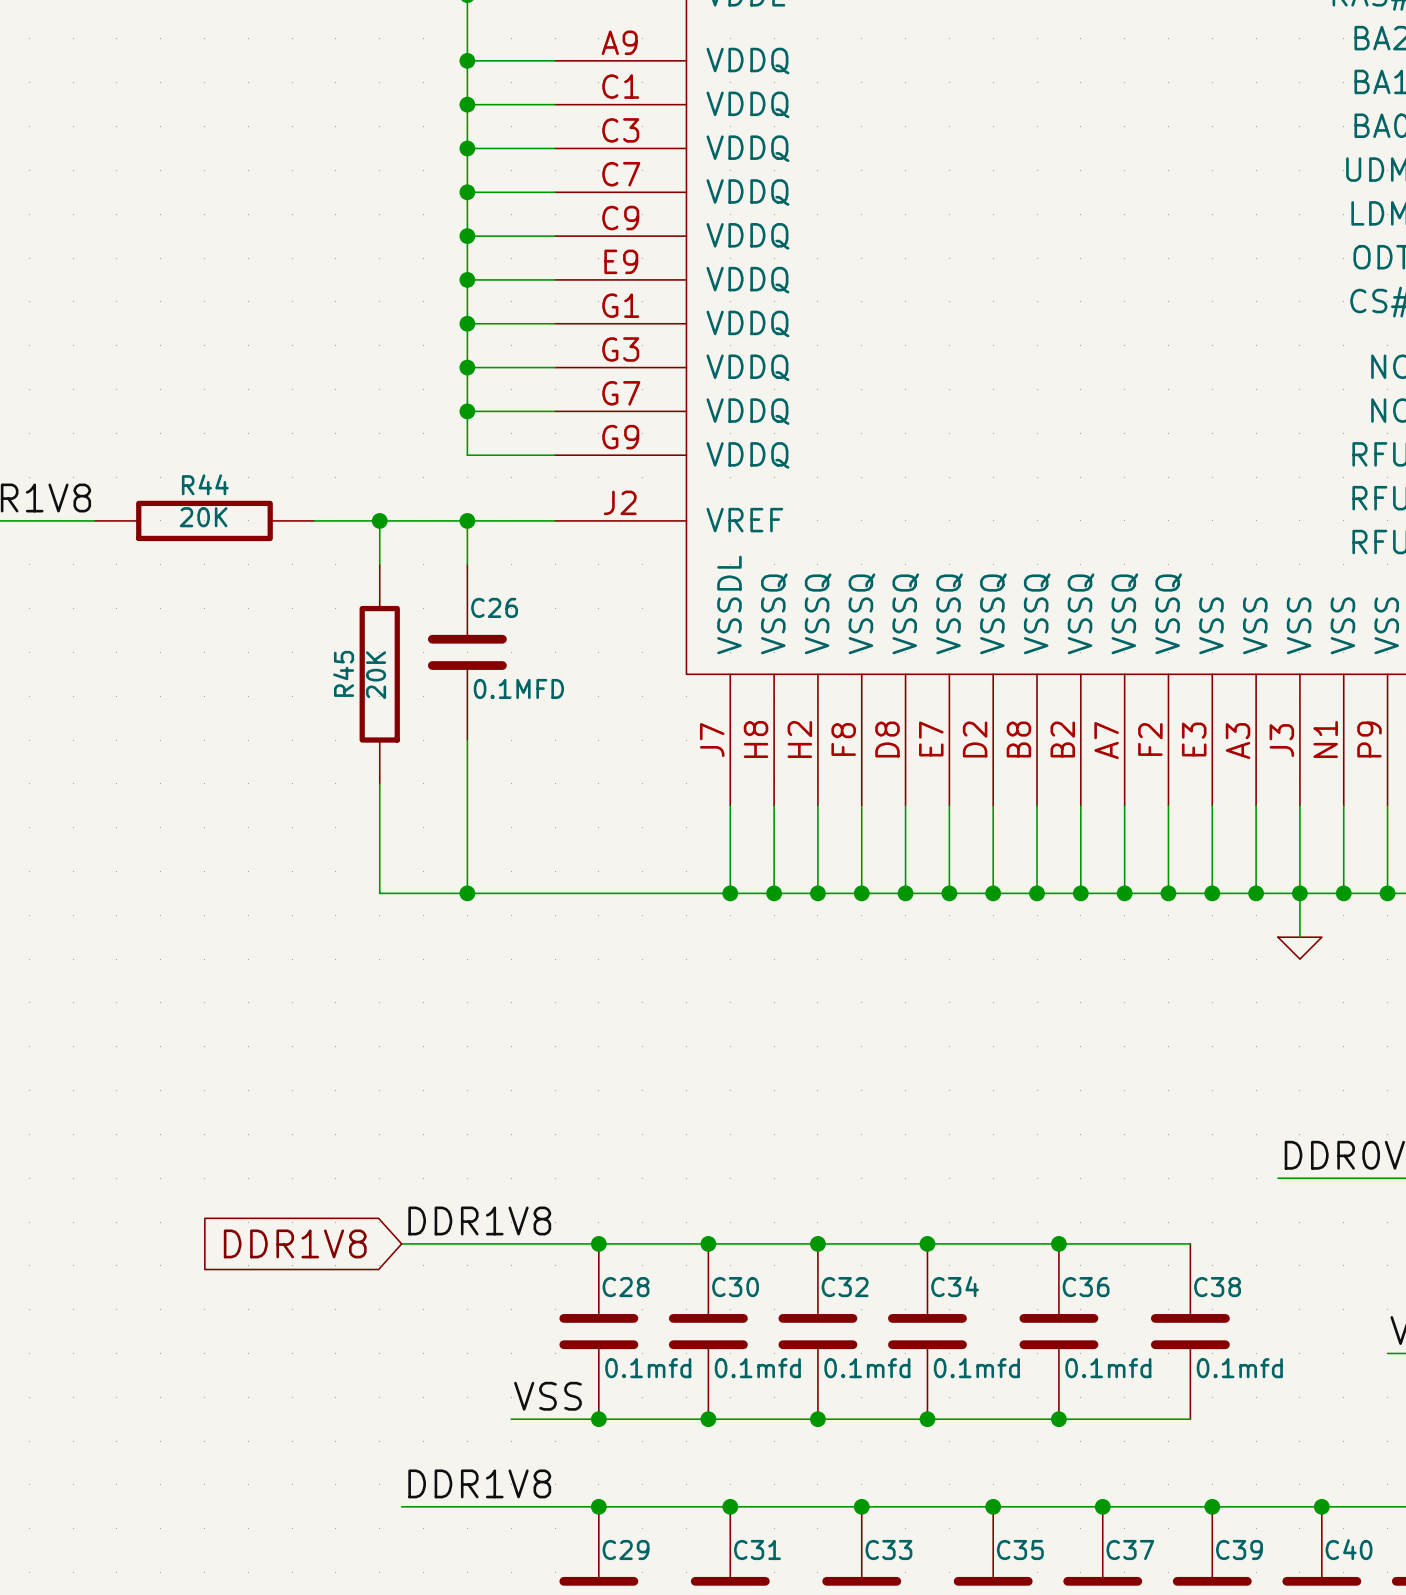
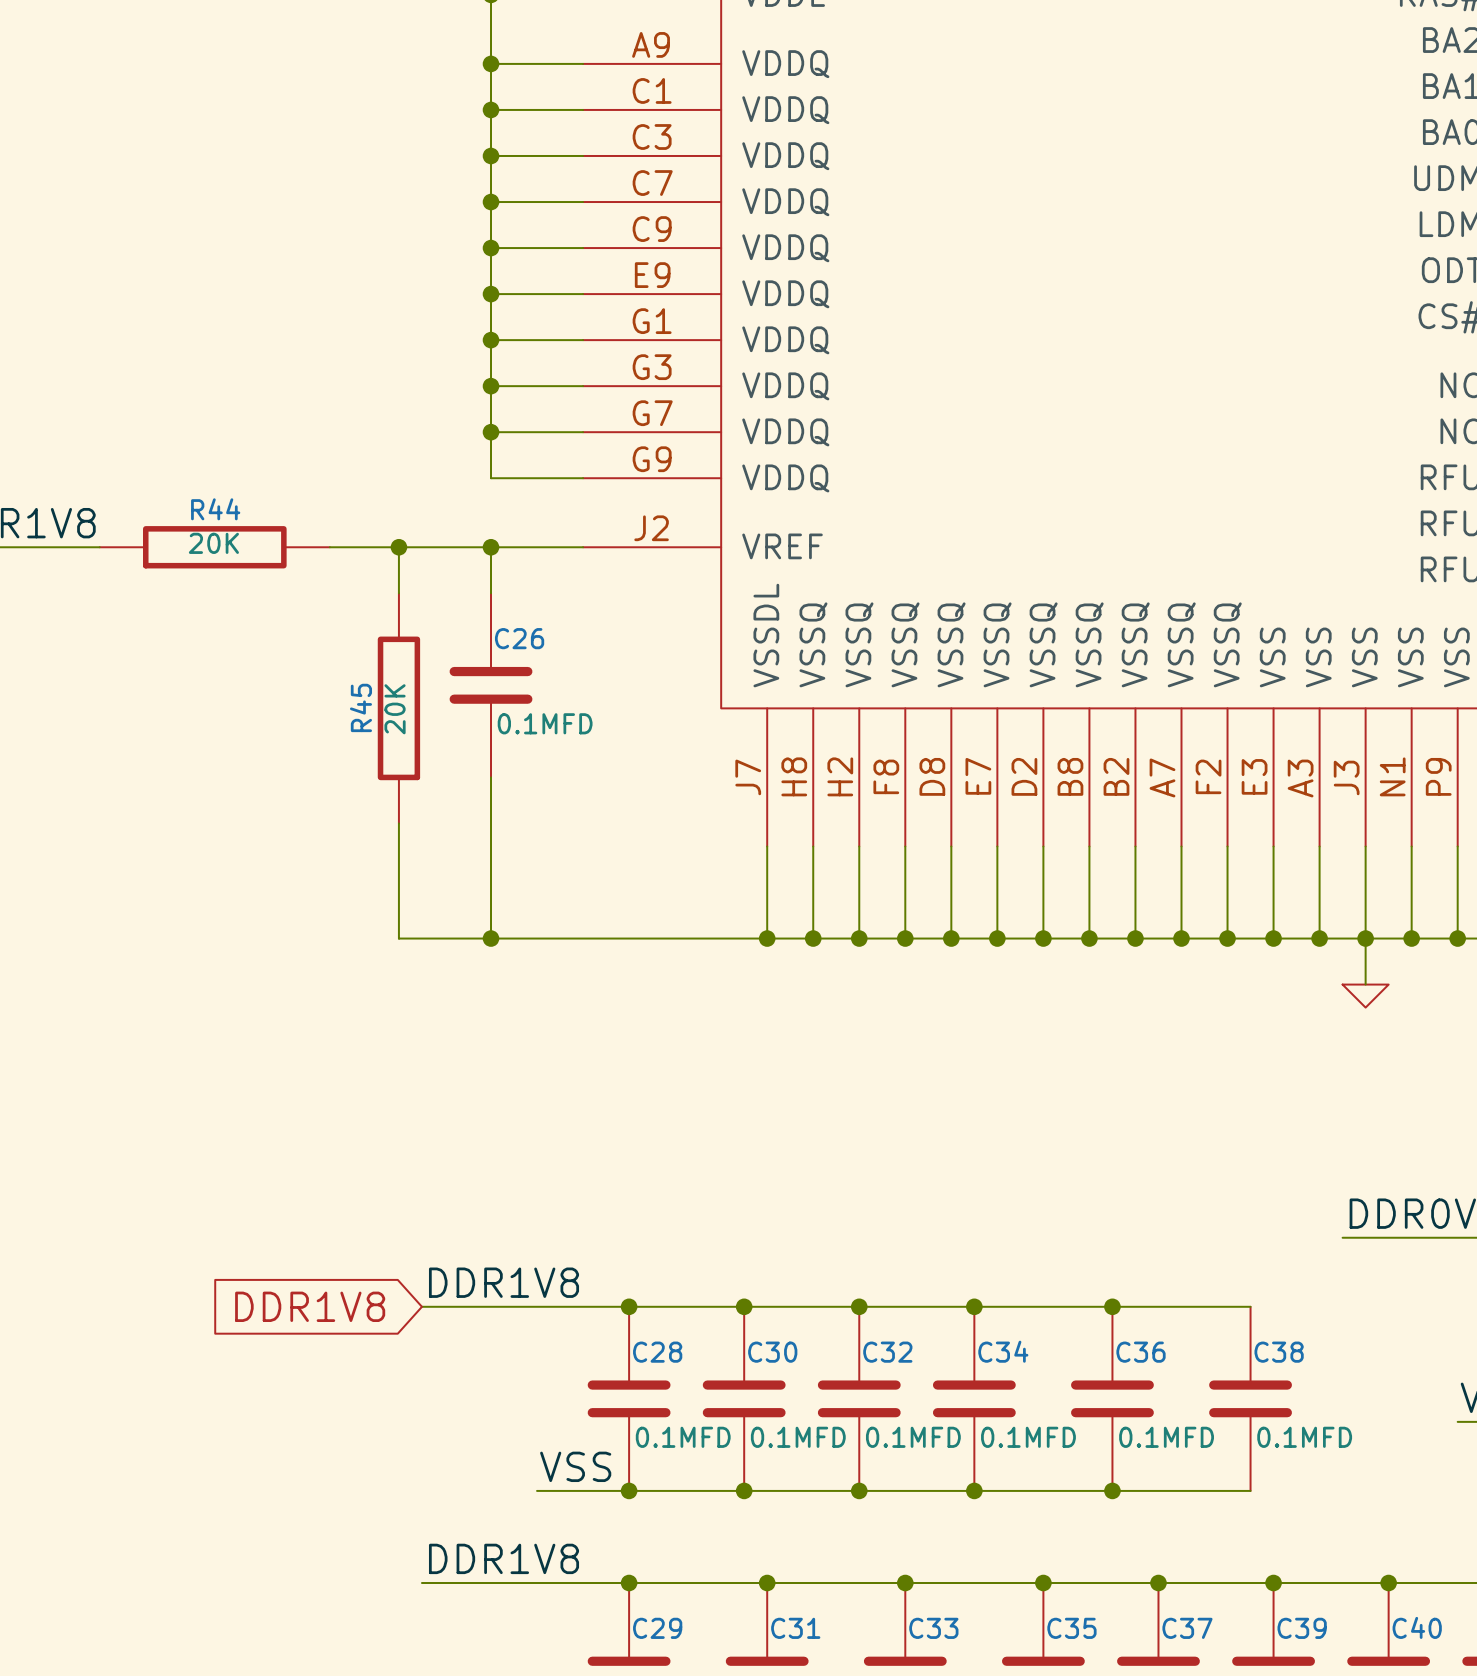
C28 value: 0.1mfd (648, 1368) -> 0.1MFD (683, 1437)
C30 value: 0.1mfd (757, 1368) -> 0.1MFD (798, 1437)
C32 value: 0.1mfd (867, 1368) -> 0.1MFD (913, 1437)
C34 value: 0.1mfd (976, 1368) -> 0.1MFD (1028, 1437)
C36 value: 0.1mfd (1108, 1368) -> 0.1MFD (1166, 1437)
C38 value: 0.1mfd (1239, 1368) -> 0.1MFD (1304, 1437)

